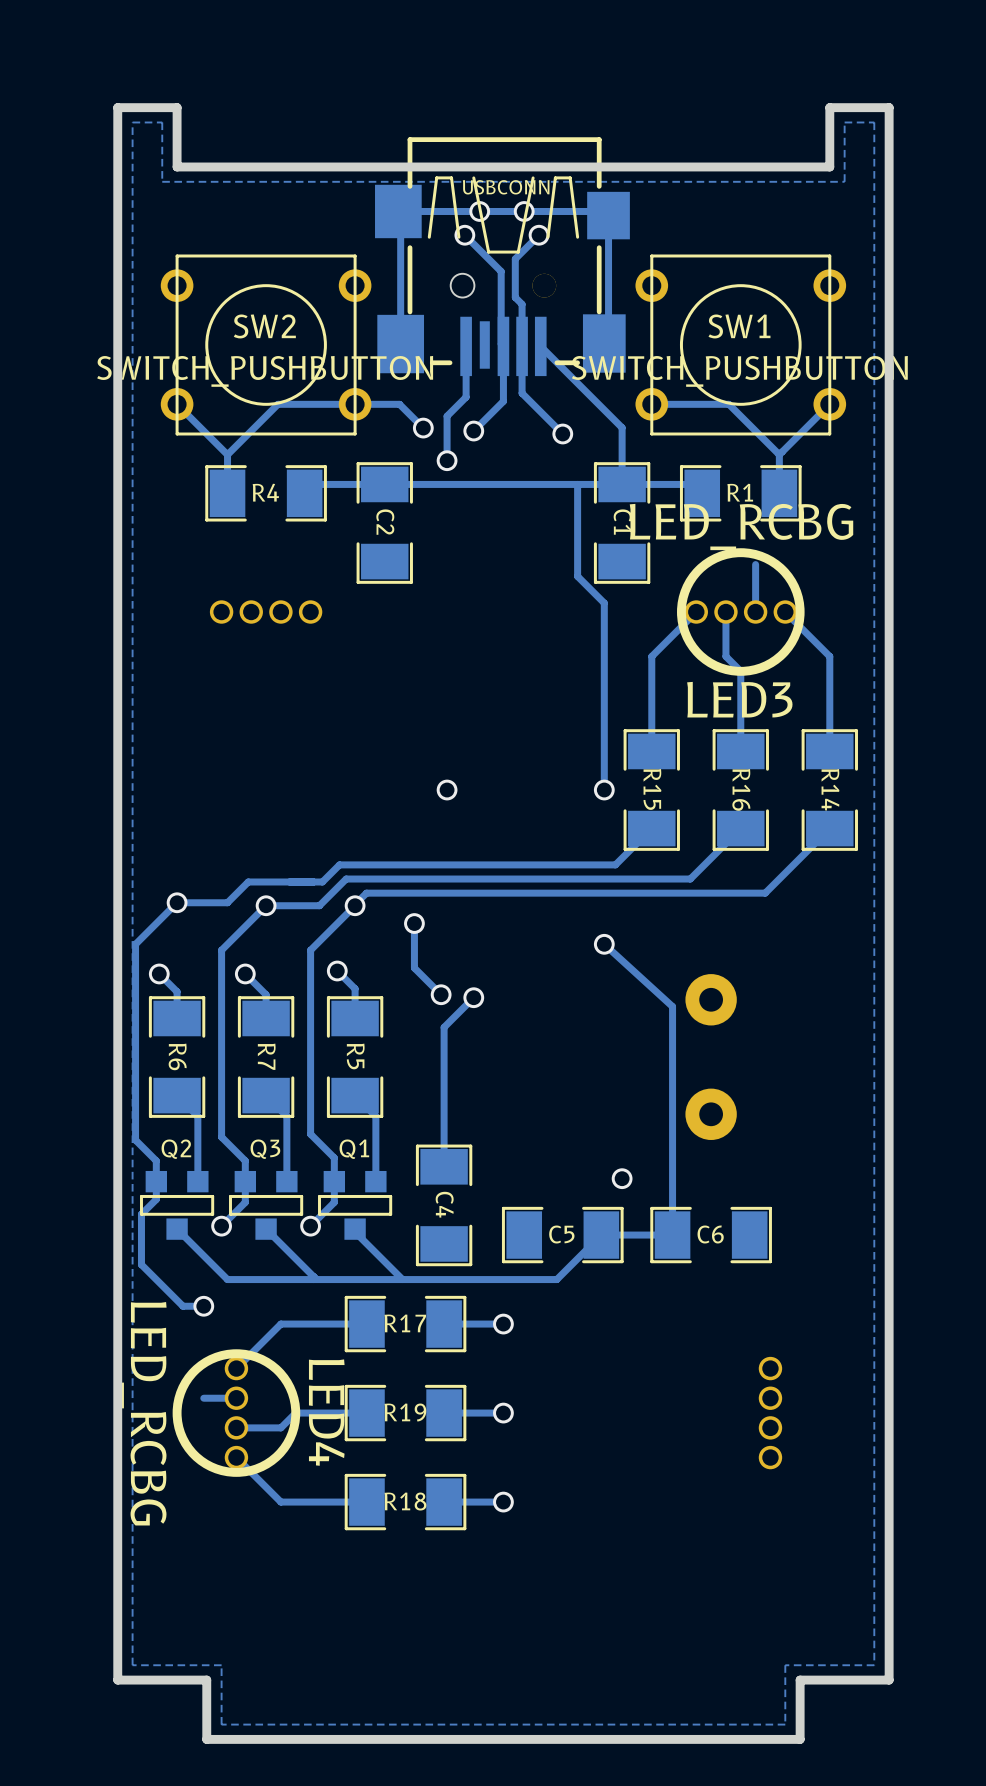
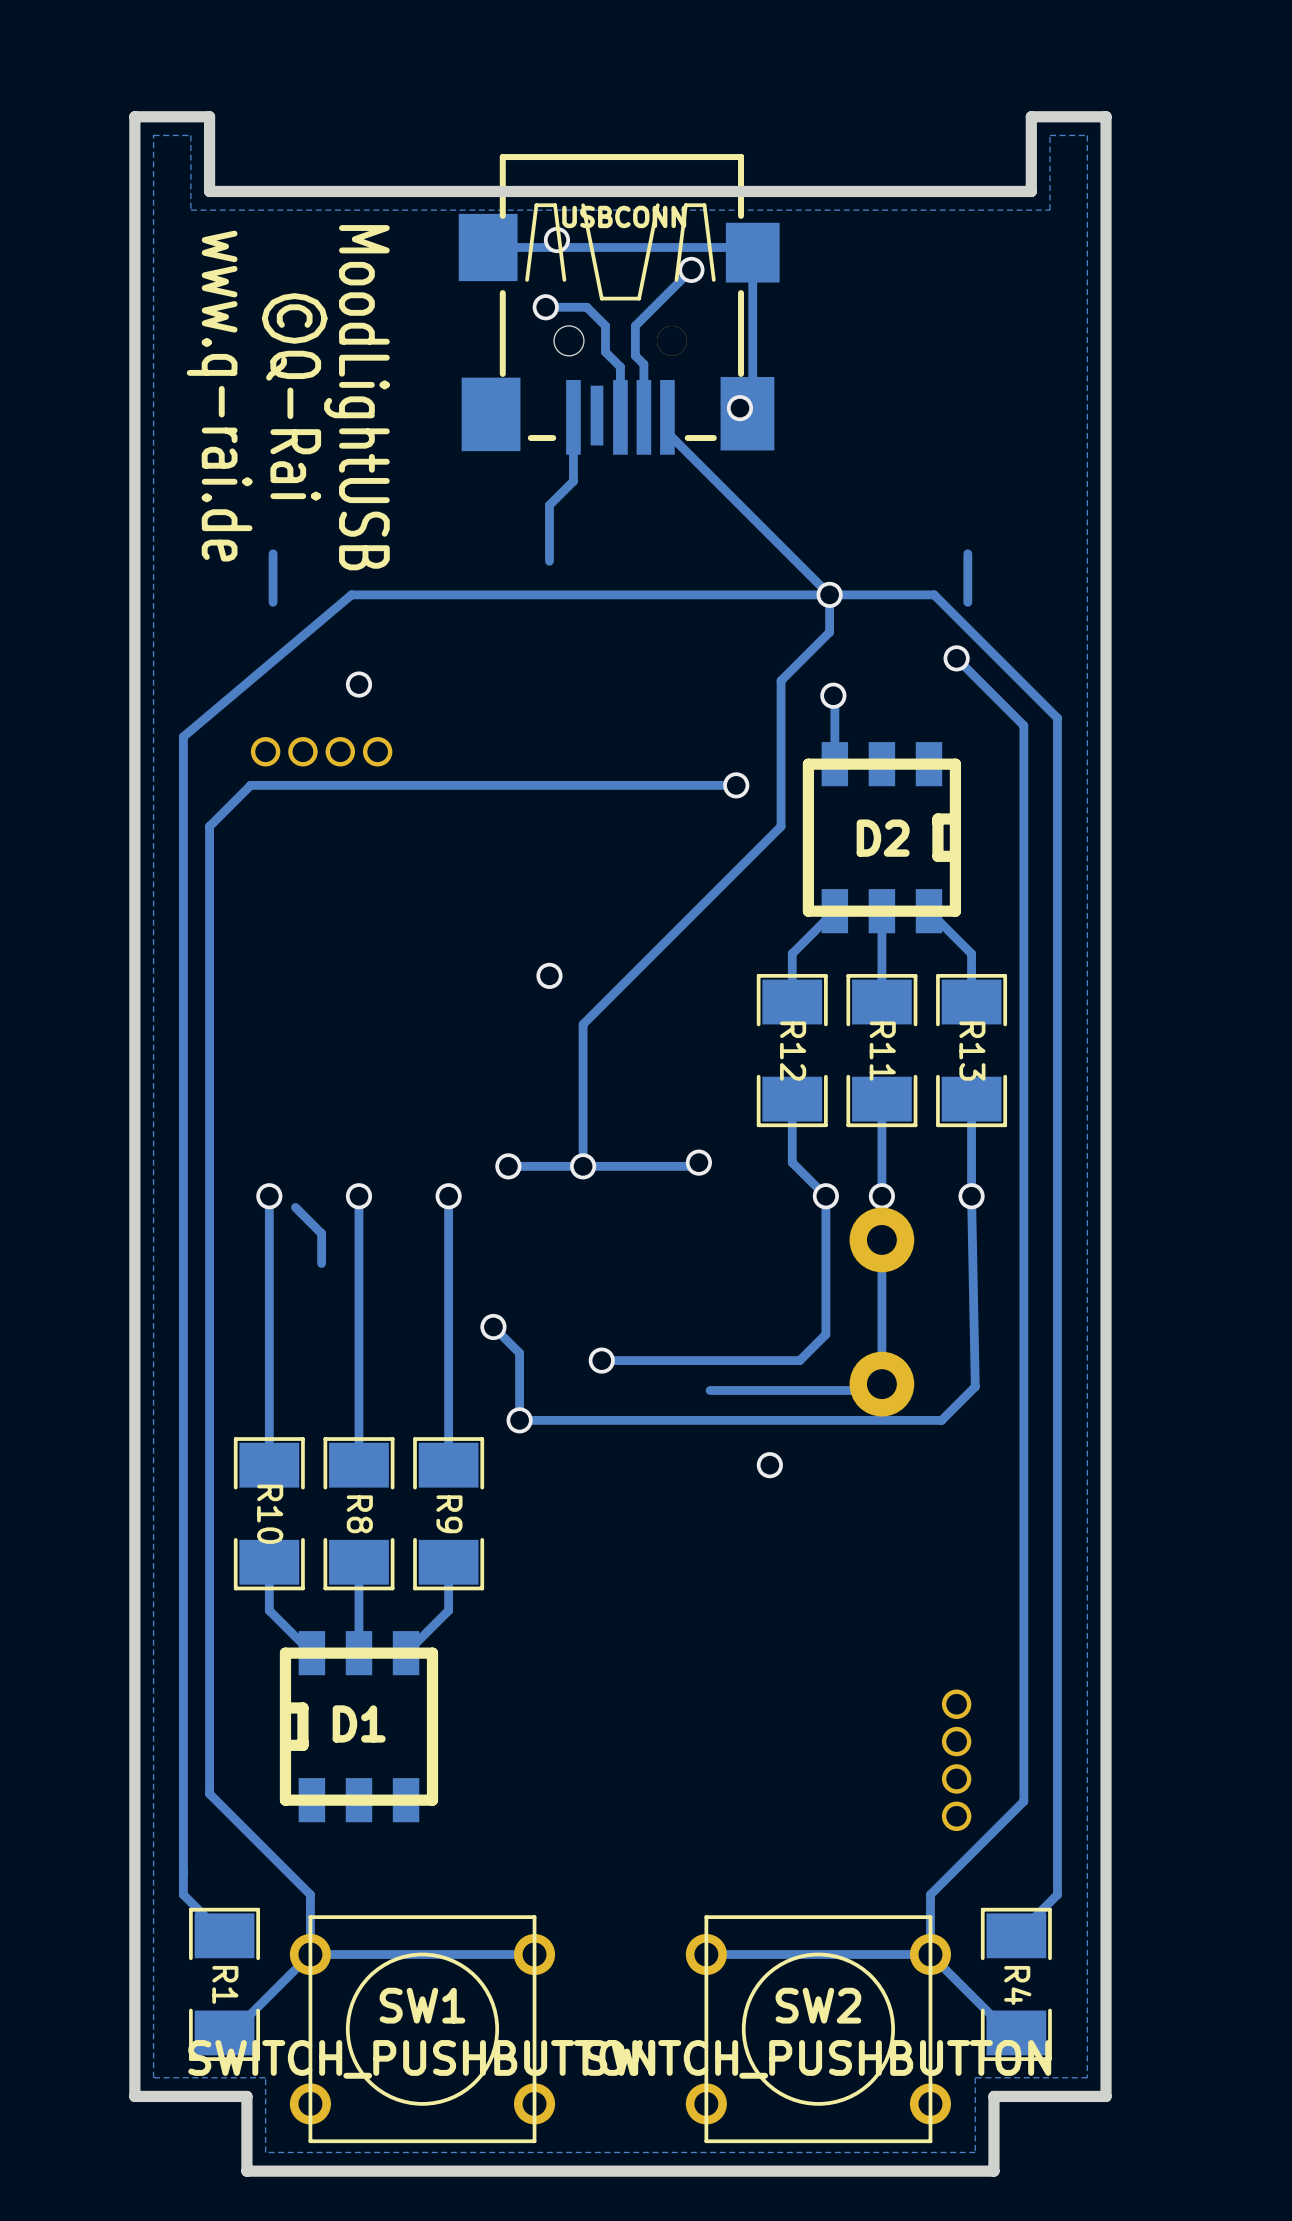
via: none -> (556, 240)
track: (398, 211) (400, 213) (400, 344) -> none
via: (479, 211) -> none
via: (524, 211) -> none
track: (464, 235) (501, 271) (503, 401) (473, 431) -> none
via: (464, 235) -> none
track: (539, 235) (515, 258) (515, 273) -> (691, 269) (635, 325)
via position: (539, 235) -> (691, 269)
track: none -> (545, 307) (586, 307) (605, 325) (605, 352) (620, 367) (620, 417)
via: none -> (545, 307)
text: none -> www.q-rai.de (219, 396)
text: none -> ©Q-Rai (294, 396)
text: none -> MoodLightUSB (356, 397)
via: none -> (739, 408)
SW2 position: (266, 344) -> (818, 2029)
SW1 position: (740, 344) -> (422, 2029)
track: (522, 346) (522, 393) (562, 434) -> none
track: (540, 346) (622, 427) (622, 484) -> (667, 417) (667, 432) (829, 594) (829, 632) (781, 680) (781, 826) (583, 1024) (583, 1166)
track: (177, 404) (227, 454) (277, 404) (399, 404) (423, 428) -> none
track: (829, 404) (779, 454) (728, 404) (651, 404) -> none
via: (423, 428) -> none
via: (473, 431) -> none
via: (562, 434) -> none
via: (447, 460) -> none
track: (577, 484) (577, 576) (604, 603) (604, 790) -> none
via: none -> (829, 594)
R4 rotation: 0° (266, 493) -> 90° clockwise (1016, 1984)
R4 position: (266, 493) -> (1016, 1984)
track: (702, 493) (693, 484) (313, 484) (304, 493) -> none
R1 rotation: 0° (740, 493) -> 90° clockwise (224, 1984)
R1 position: (740, 493) -> (224, 1984)
C2: (384, 523) -> none
C1: (622, 523) -> none
track: none -> (956, 658) (1023, 725) (1023, 1801) (930, 1894) (930, 1954)
via: none -> (956, 658)
via: none -> (358, 684)
track: (755, 564) (755, 612) -> none
track: none -> (833, 695) (834, 764)
via: none -> (833, 695)
track: (696, 612) (651, 656) (651, 751) -> none
track: (725, 612) (725, 656) (740, 671) (740, 751) -> none
LED3: LED_RCBG (740, 612) -> none
track: (785, 612) (829, 656) (829, 751) -> none
via: none -> (736, 785)
D2: none -> (881, 837)
track: none -> (834, 911) (792, 953) (792, 1002)
track: none -> (881, 911) (881, 1002)
track: none -> (928, 911) (971, 953) (971, 1002)
via: (604, 790) -> none
R15: (651, 790) -> none
R16: (740, 790) -> none
R14: (829, 790) -> none
track: (651, 828) (615, 864) (339, 864) (322, 881) (248, 881) (227, 902) (177, 902) (135, 944) (135, 1140) (156, 1160) -> (1016, 1935) (1057, 1894) (1057, 718) (934, 594) (351, 594) (183, 736) (183, 1442)
track: (740, 828) (690, 879) (346, 879) (319, 905) (266, 905) (221, 950) (221, 1137) (245, 1160) (245, 1202) (221, 1226) -> none
track: (829, 828) (765, 893) (366, 893) (310, 950) (310, 1134) (334, 1157) (334, 1202) (310, 1226) -> none
R12: none -> (792, 1050)
R11: none -> (881, 1050)
R13: none -> (971, 1050)
track: none -> (792, 1099) (792, 1162) (825, 1196) (825, 1334) (799, 1360) (601, 1360)
track: none -> (881, 1099) (881, 1371) (863, 1390) (710, 1390)
track: none -> (971, 1099) (975, 1386) (941, 1420) (519, 1420) (519, 1353) (493, 1326)
via: (177, 902) -> none
via: (266, 905) -> none
via: (355, 905) -> none
track: (414, 923) (414, 968) (441, 994) -> none
via position: (414, 923) -> (508, 1166)
track: none -> (698, 1162) (695, 1166) (508, 1166)
via: none -> (698, 1162)
via: none -> (583, 1166)
track: (604, 944) (672, 1006) (672, 1235) (601, 1235) (556, 1279) (227, 1279) (177, 1229) -> none
via: (604, 944) -> none
track: none -> (269, 1196) (269, 1465)
track: none -> (358, 1196) (358, 1465)
via: none -> (358, 1196)
track: none -> (448, 1196) (448, 1465)
via: none -> (448, 1196)
via: none -> (825, 1196)
via: none -> (881, 1196)
via: none -> (971, 1196)
track: (337, 971) (355, 988) (355, 1018) -> none
via: (337, 971) -> none
track: (159, 973) (177, 991) -> (736, 785) (250, 785) (209, 826) (209, 1229)
via: (159, 973) -> none
via position: (245, 973) -> (269, 1196)
via: (441, 994) -> none
track: (473, 997) (444, 1027) (444, 1166) -> none
via: (473, 997) -> none
track: none -> (209, 1263) (209, 1793) (310, 1894) (310, 1954)
R6: (177, 1057) -> none
R7: (266, 1057) -> none
R5: (355, 1057) -> none
via: none -> (493, 1326)
track: (177, 1095) (197, 1116) (197, 1181) -> none
track: (266, 1095) (286, 1116) (286, 1181) -> none
track: (355, 1095) (375, 1116) (375, 1181) -> none
via: none -> (601, 1360)
via: none -> (519, 1420)
track: (156, 1199) (141, 1214) (141, 1264) (183, 1306) (203, 1306) -> (183, 1491) (183, 1894) (224, 1935)
Q2: (177, 1205) -> none
Q3: (266, 1205) -> none
Q1: (355, 1205) -> none
C4: (444, 1205) -> none
R10: none -> (269, 1513)
R8: none -> (358, 1513)
R9: none -> (448, 1513)
via: (221, 1226) -> none
via: (310, 1226) -> none
track: (266, 1229) (316, 1279) -> none
track: (355, 1229) (355, 1232) (402, 1279) -> none
C5: (562, 1235) -> none
C6: (711, 1235) -> none
track: none -> (269, 1562) (269, 1610) (311, 1653)
track: none -> (358, 1562) (358, 1653)
track: none -> (448, 1562) (448, 1610) (406, 1653)
via: (203, 1306) -> none
track: (366, 1324) (280, 1324) (236, 1368) -> none
R17: (405, 1324) -> none
track: (503, 1324) (444, 1324) -> none
via: (503, 1324) -> none
D1: none -> (358, 1726)
track: (236, 1398) (203, 1398) -> none
LED4: LED_RCBG (236, 1413) -> none
track: (366, 1413) (295, 1413) (280, 1427) (236, 1427) -> none
R19: (405, 1413) -> none
track: (503, 1413) (444, 1413) -> none
via: (503, 1413) -> none
track: (236, 1457) (280, 1502) (366, 1502) -> none
R18: (405, 1502) -> none
track: (503, 1502) (444, 1502) -> none
via: (503, 1502) -> none
track: none -> (310, 1954) (231, 2032) (224, 2032)
track: none -> (534, 1954) (310, 1954)
track: none -> (930, 1954) (706, 1954)
track: none -> (930, 1954) (1008, 2032) (1016, 2032)

